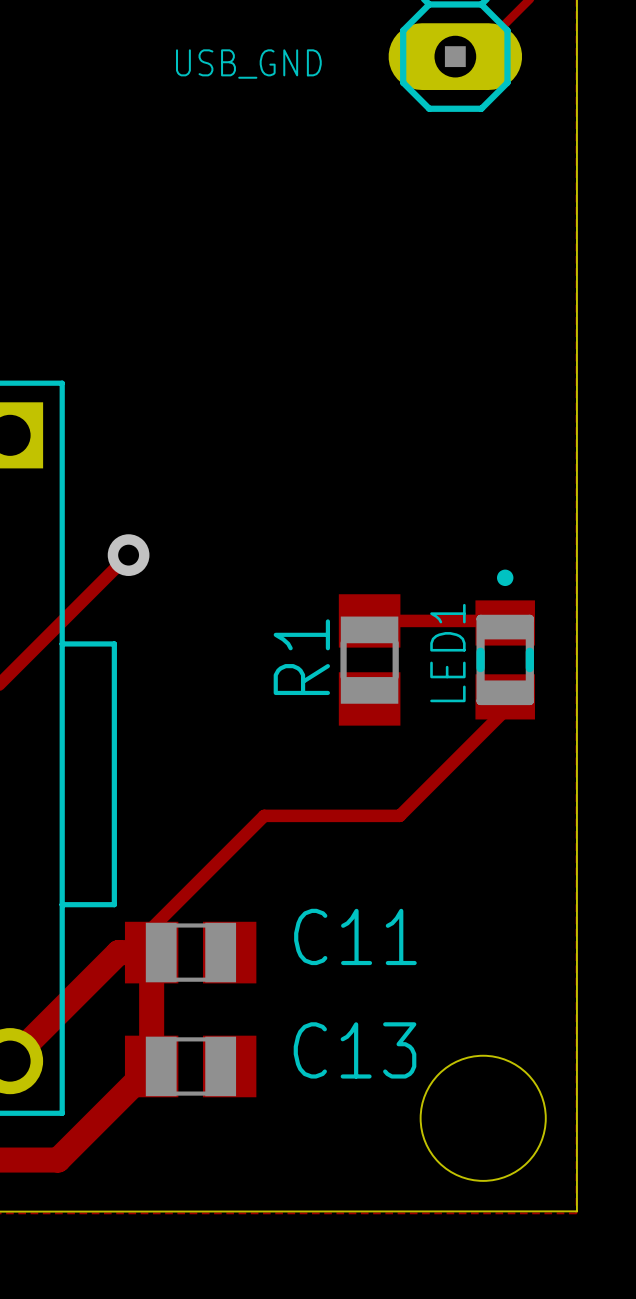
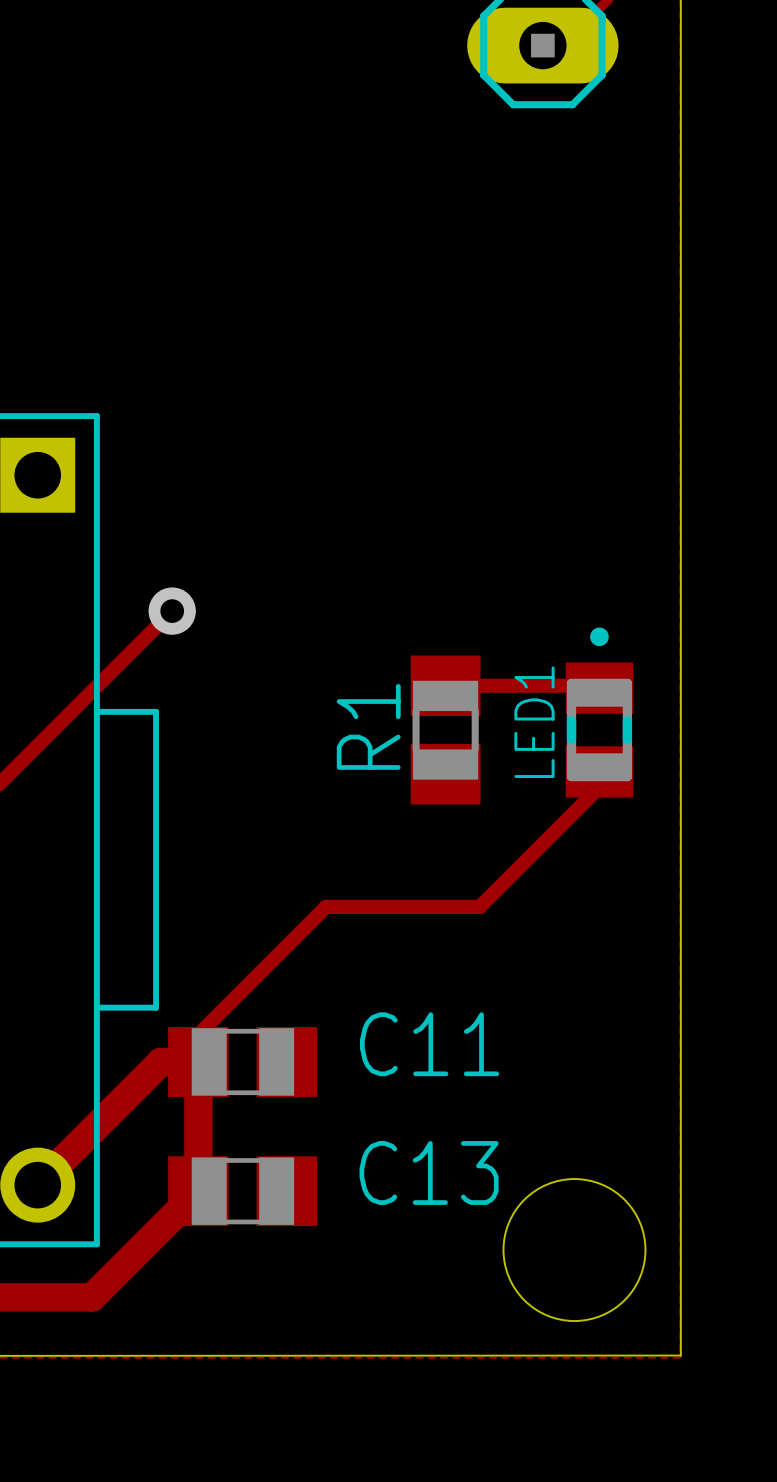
text: USB_GND (248, 64) -> none

